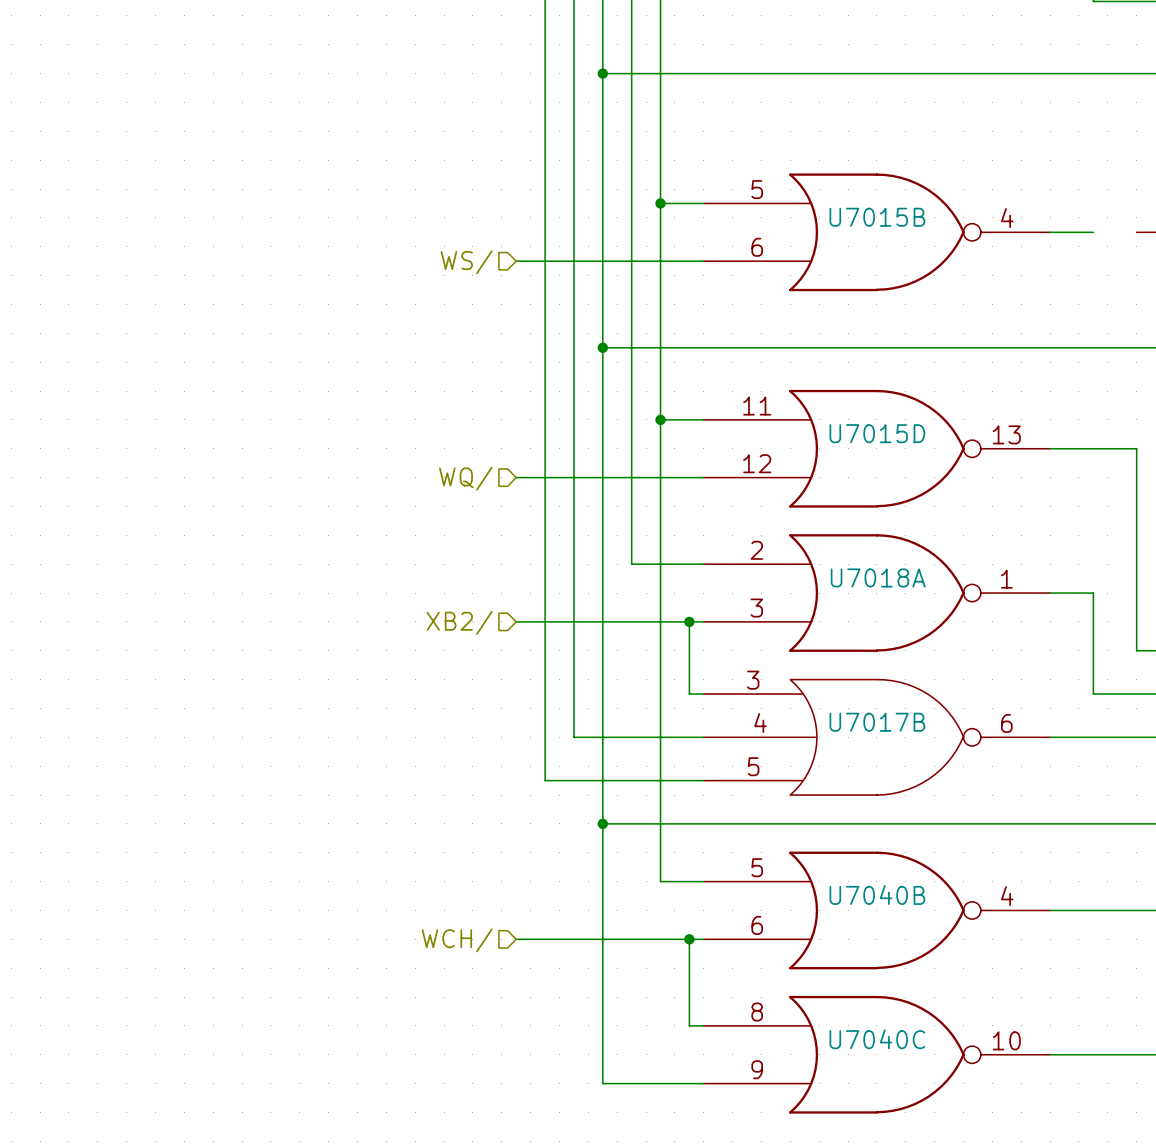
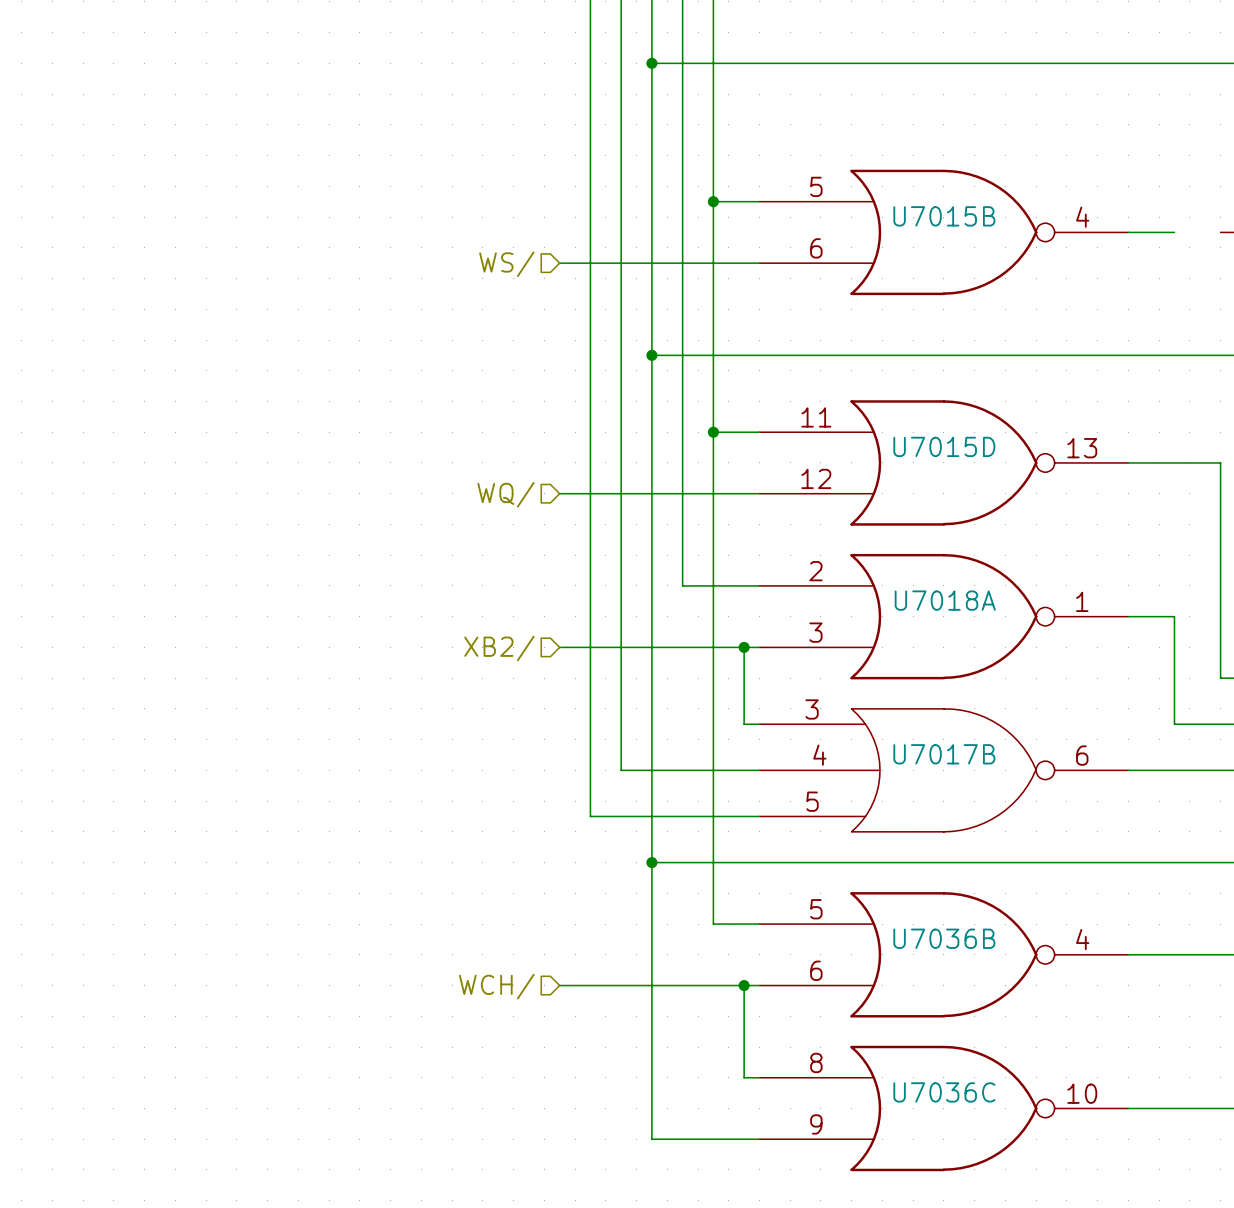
U7040B name: U7040B (877, 894) -> U7036B (944, 938)
U7040C name: U7040C (877, 1039) -> U7036C (944, 1092)

